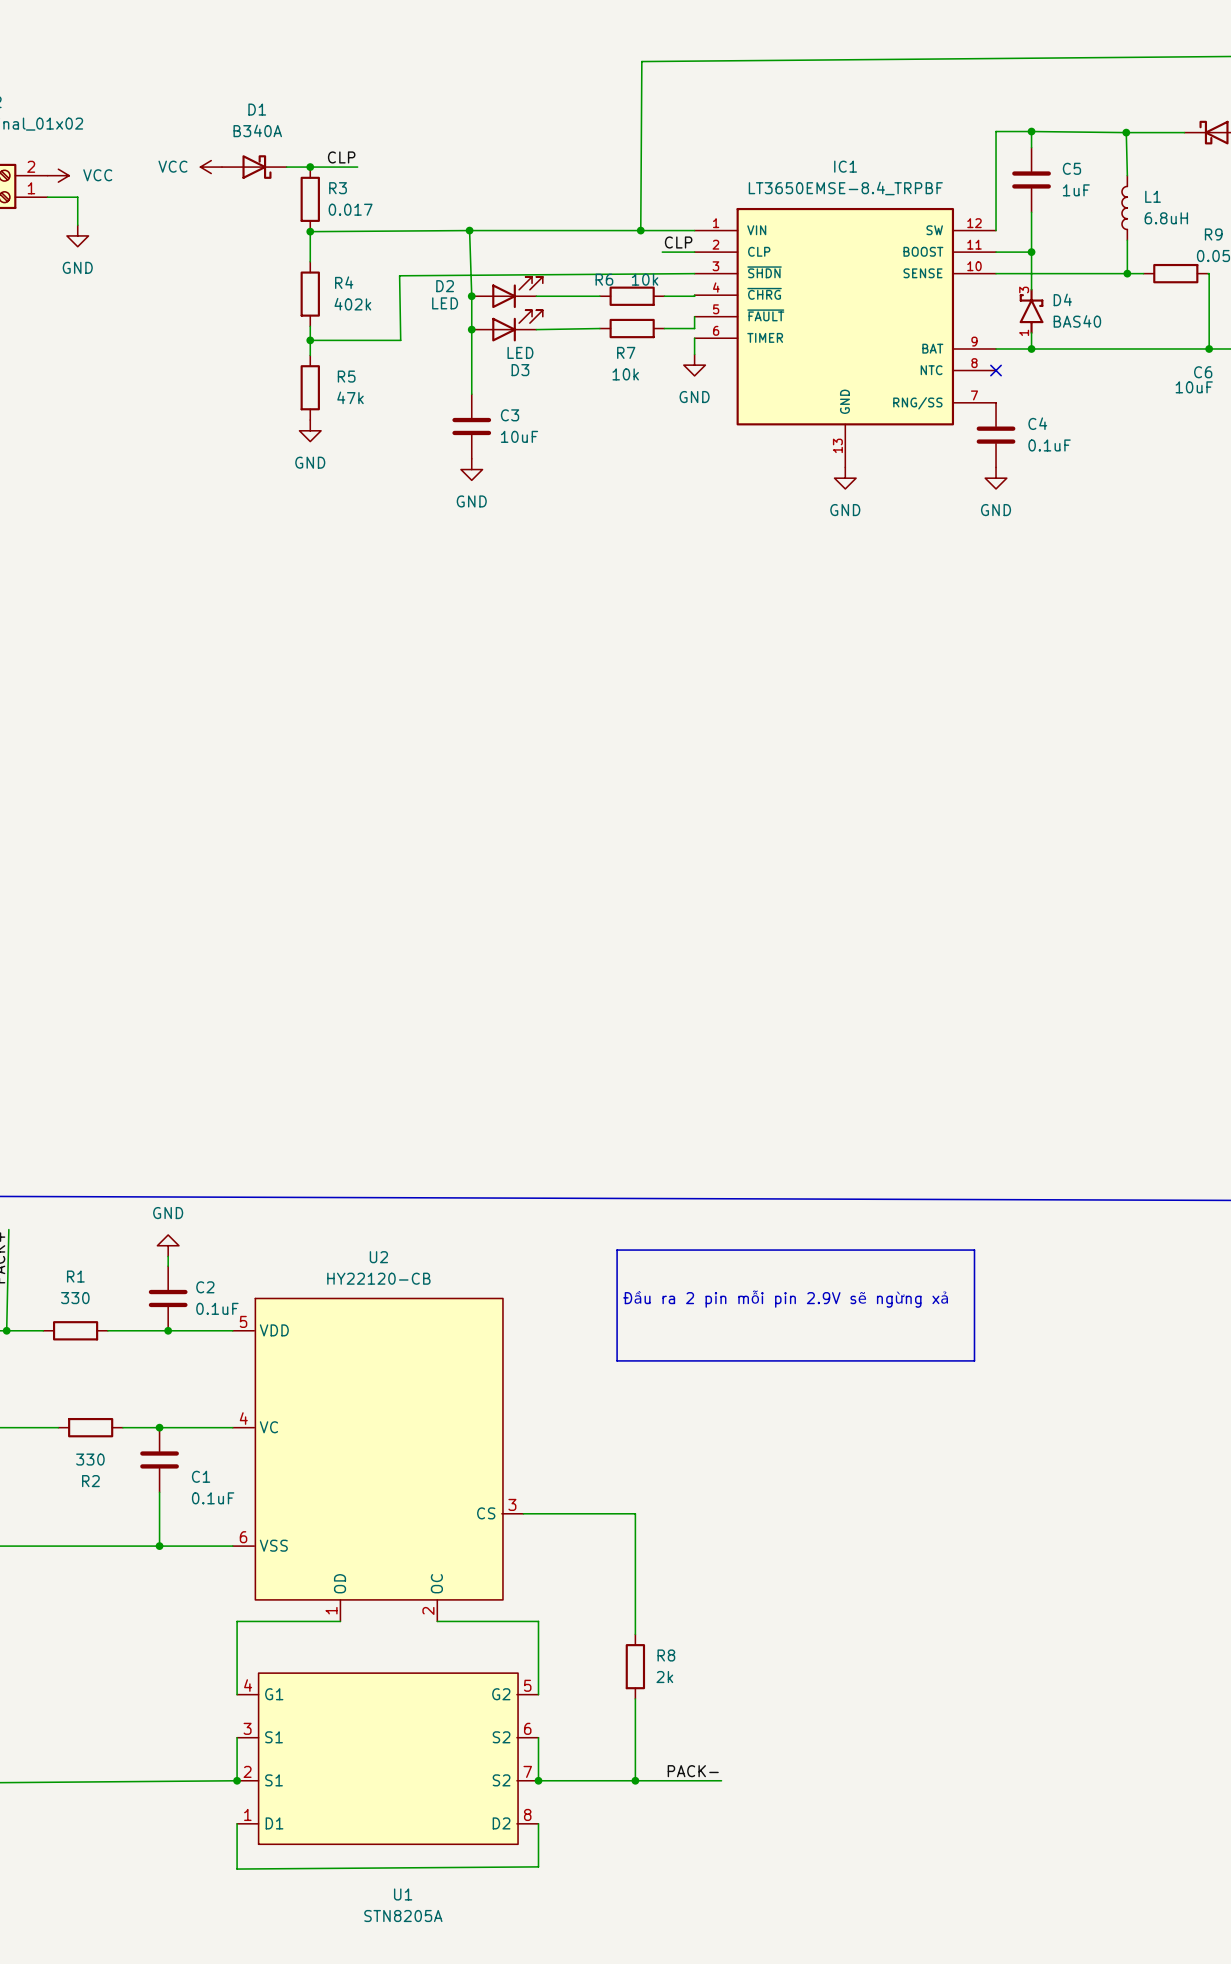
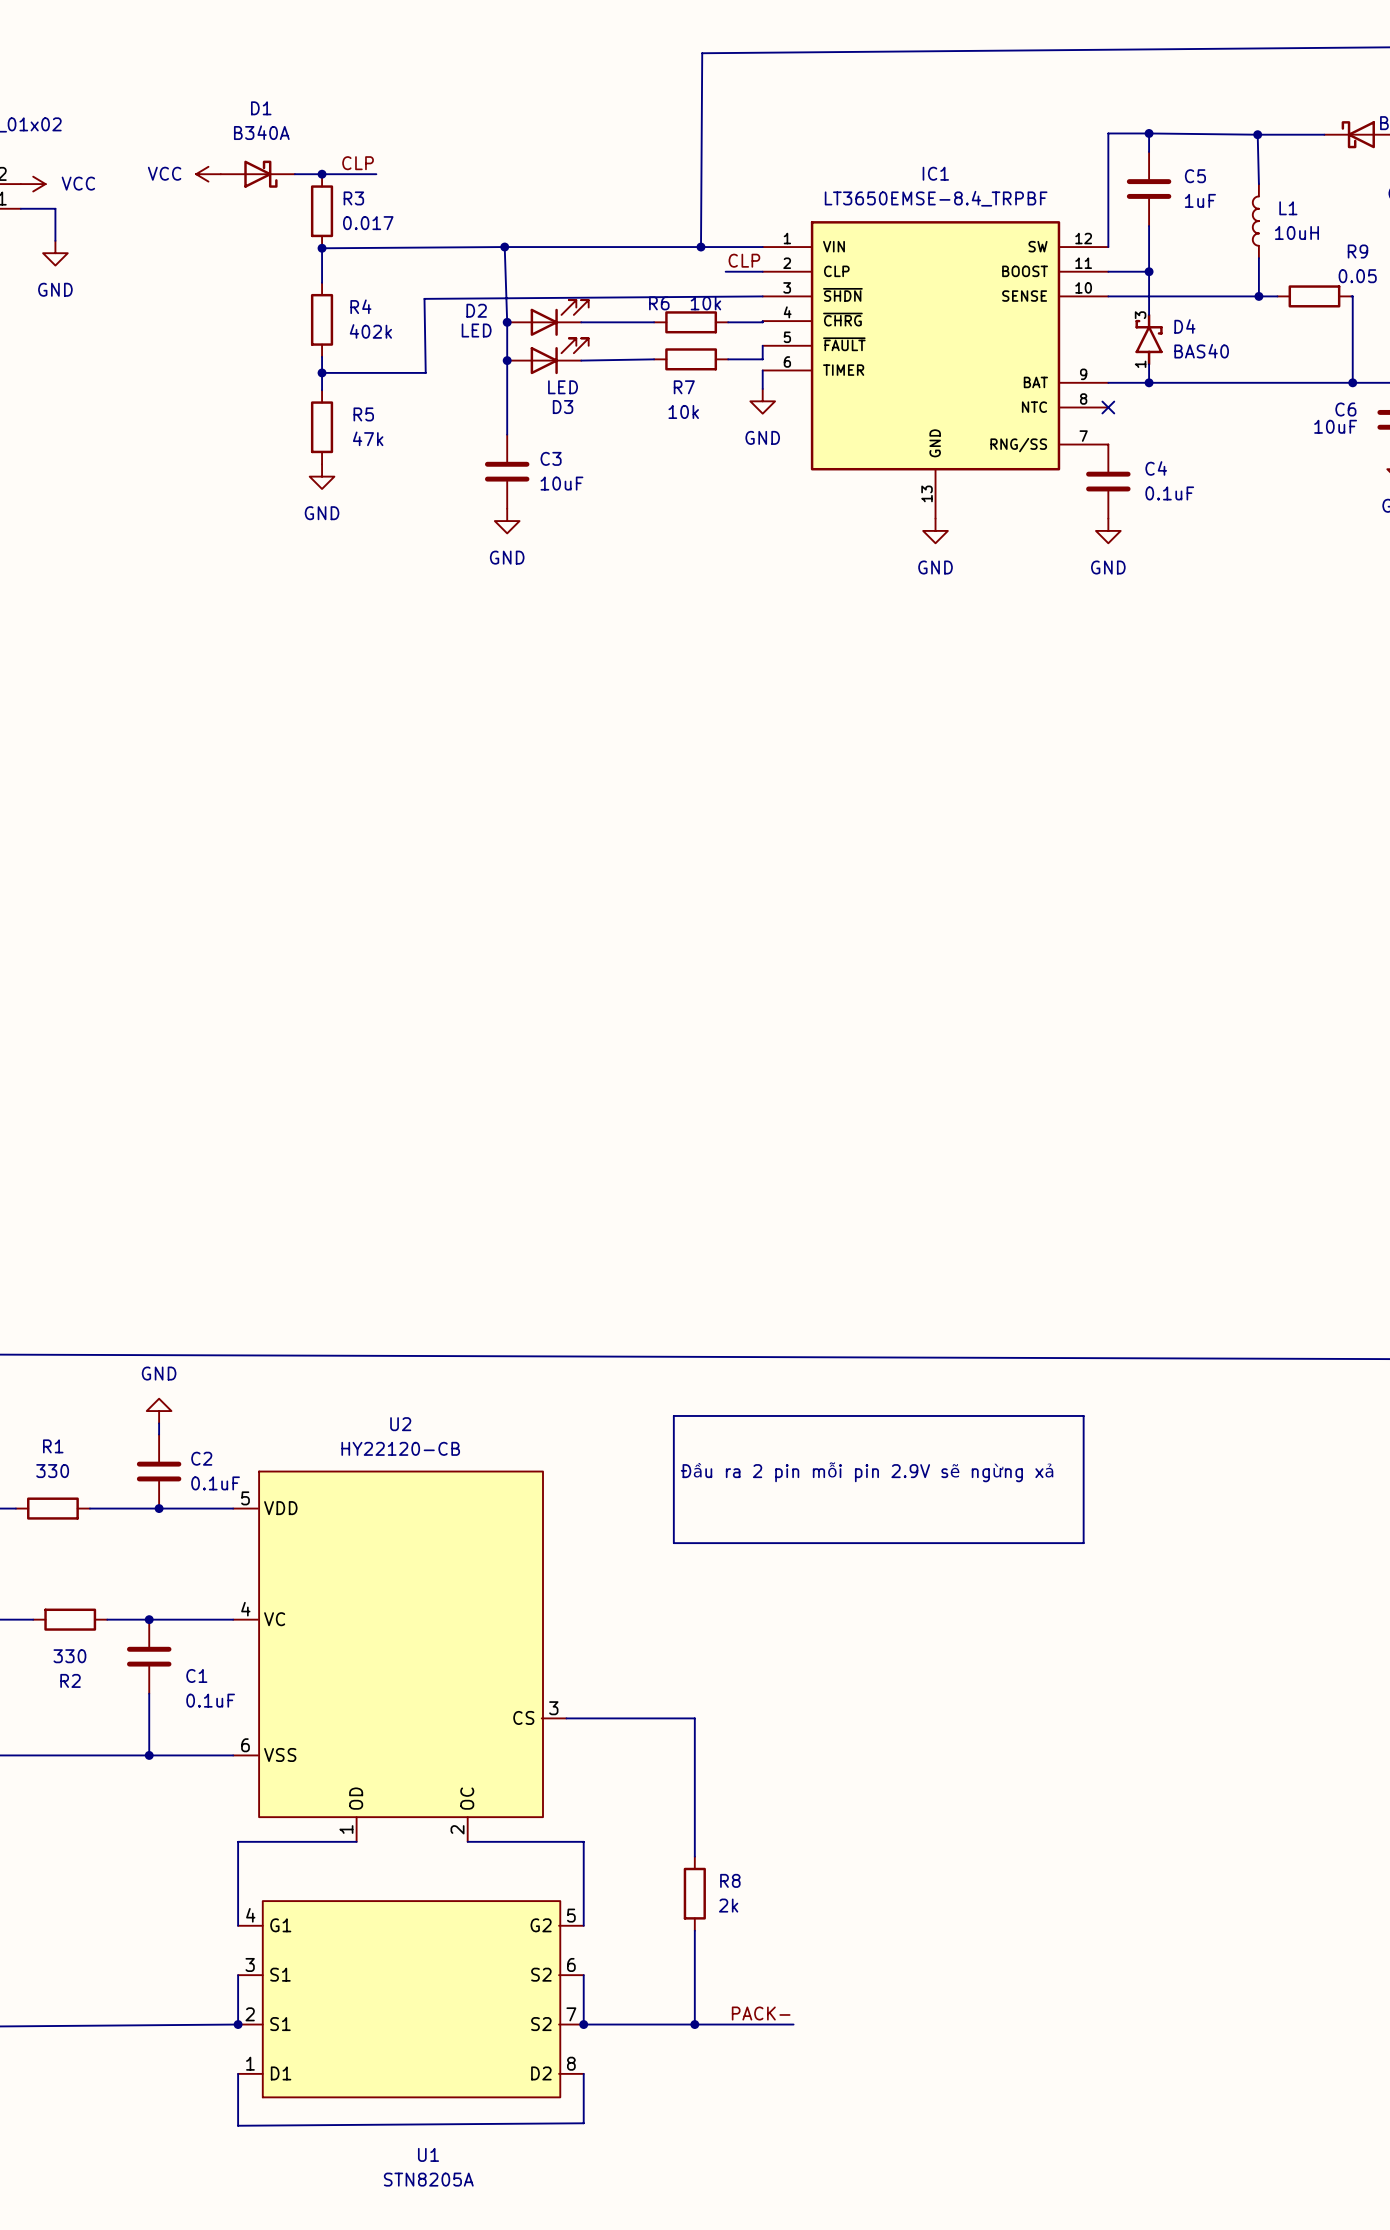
L1 value: 6.8uH (1166, 218) -> 10uH (1296, 232)

